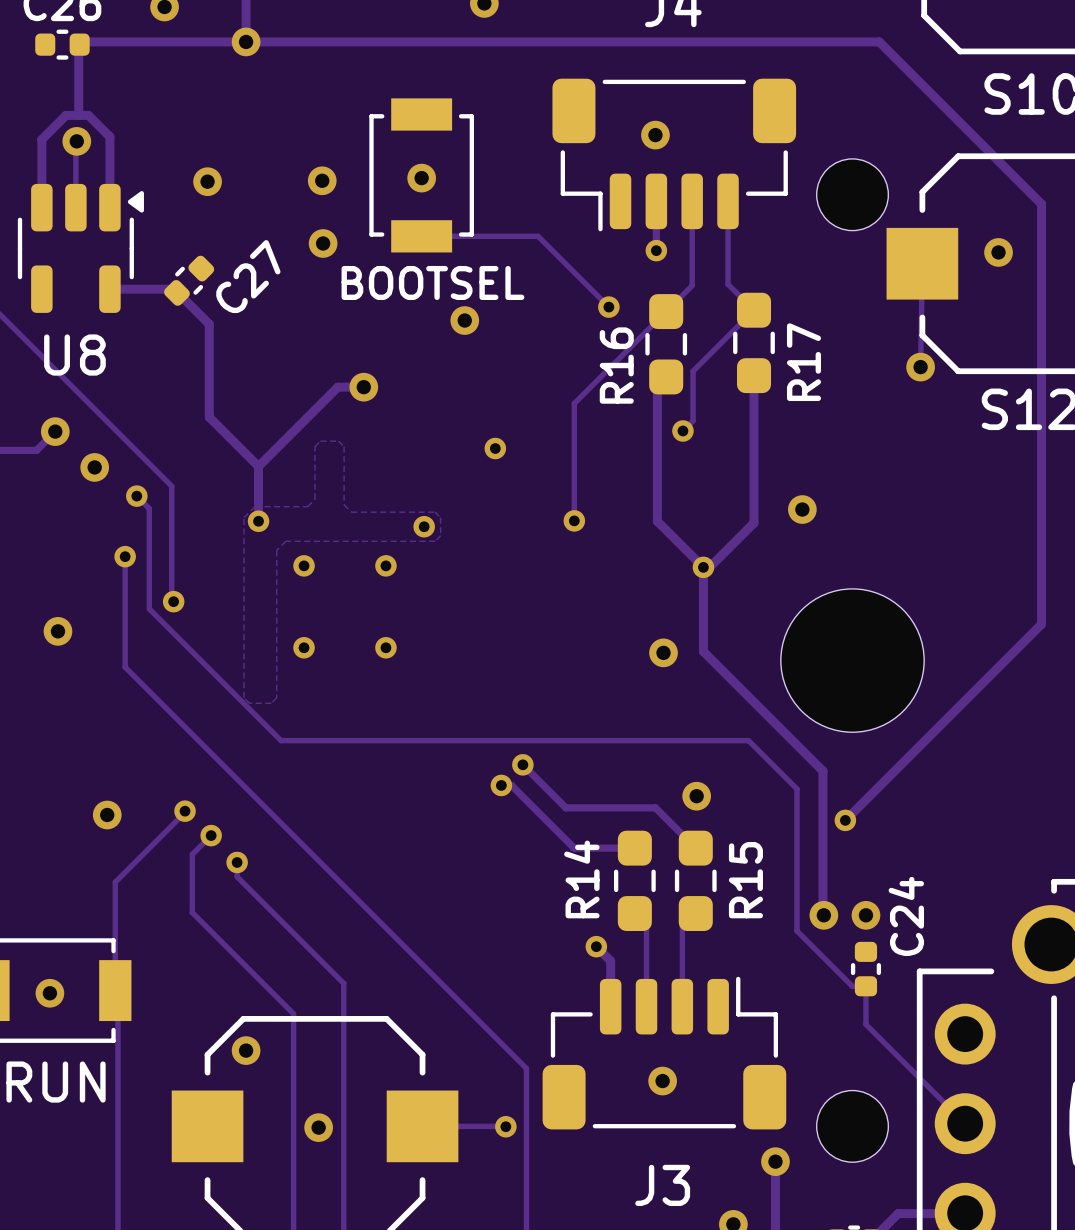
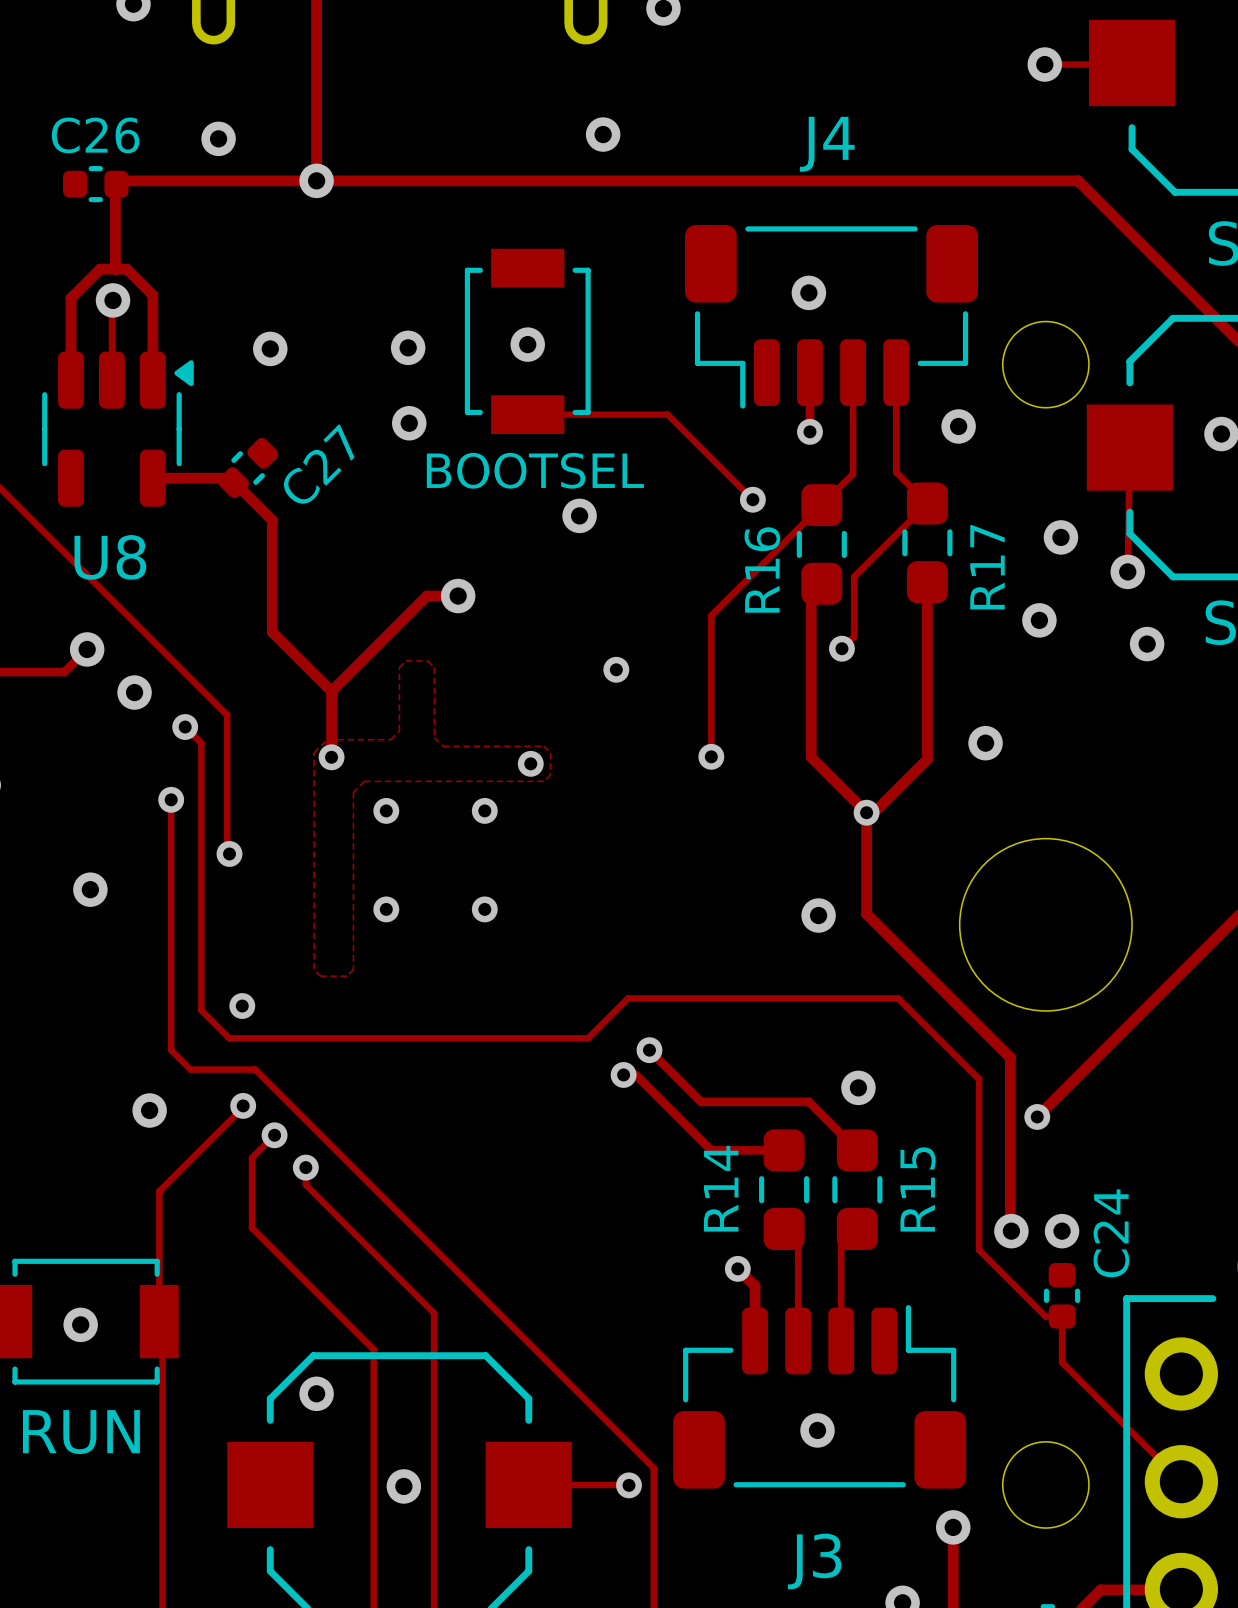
via: none -> (958, 426)
via: none -> (1060, 537)
via: none -> (1039, 620)
via: none -> (1147, 644)
track: (149, 508) (149, 608) (281, 740) (748, 740) -> (200, 742) (201, 1010) (229, 1038) (588, 1038) (627, 998) (898, 998) (920, 1021)
track: (125, 667) (526, 1068) (526, 1112) -> (171, 932) (171, 1050) (190, 1069) (255, 1069) (653, 1468)
via: none -> (242, 1006)

